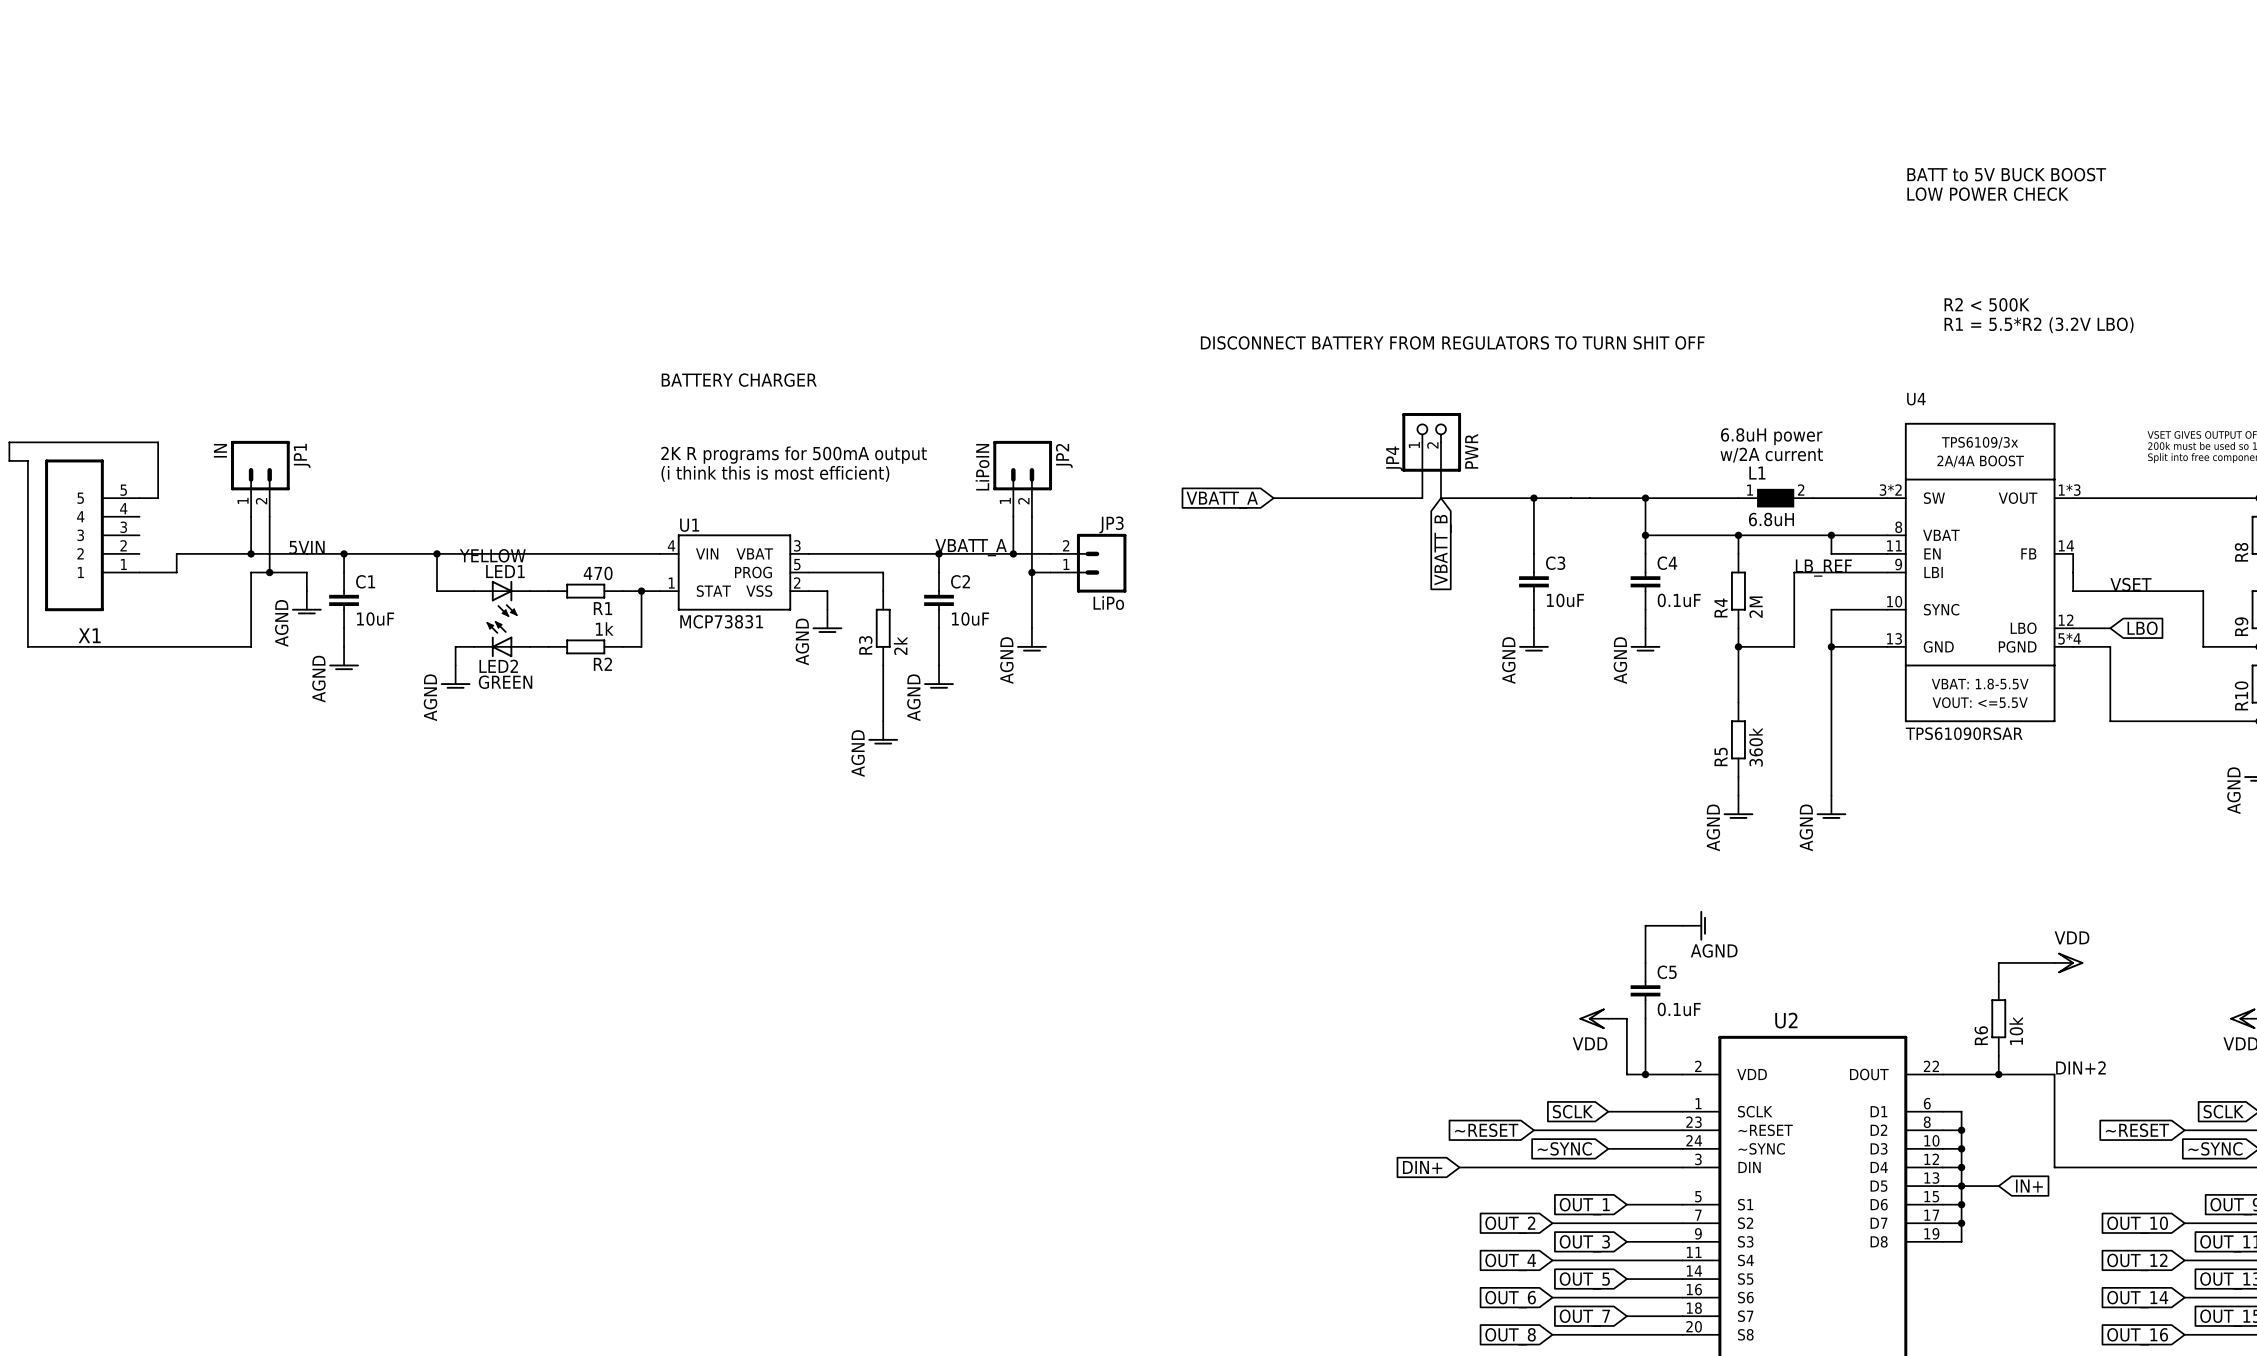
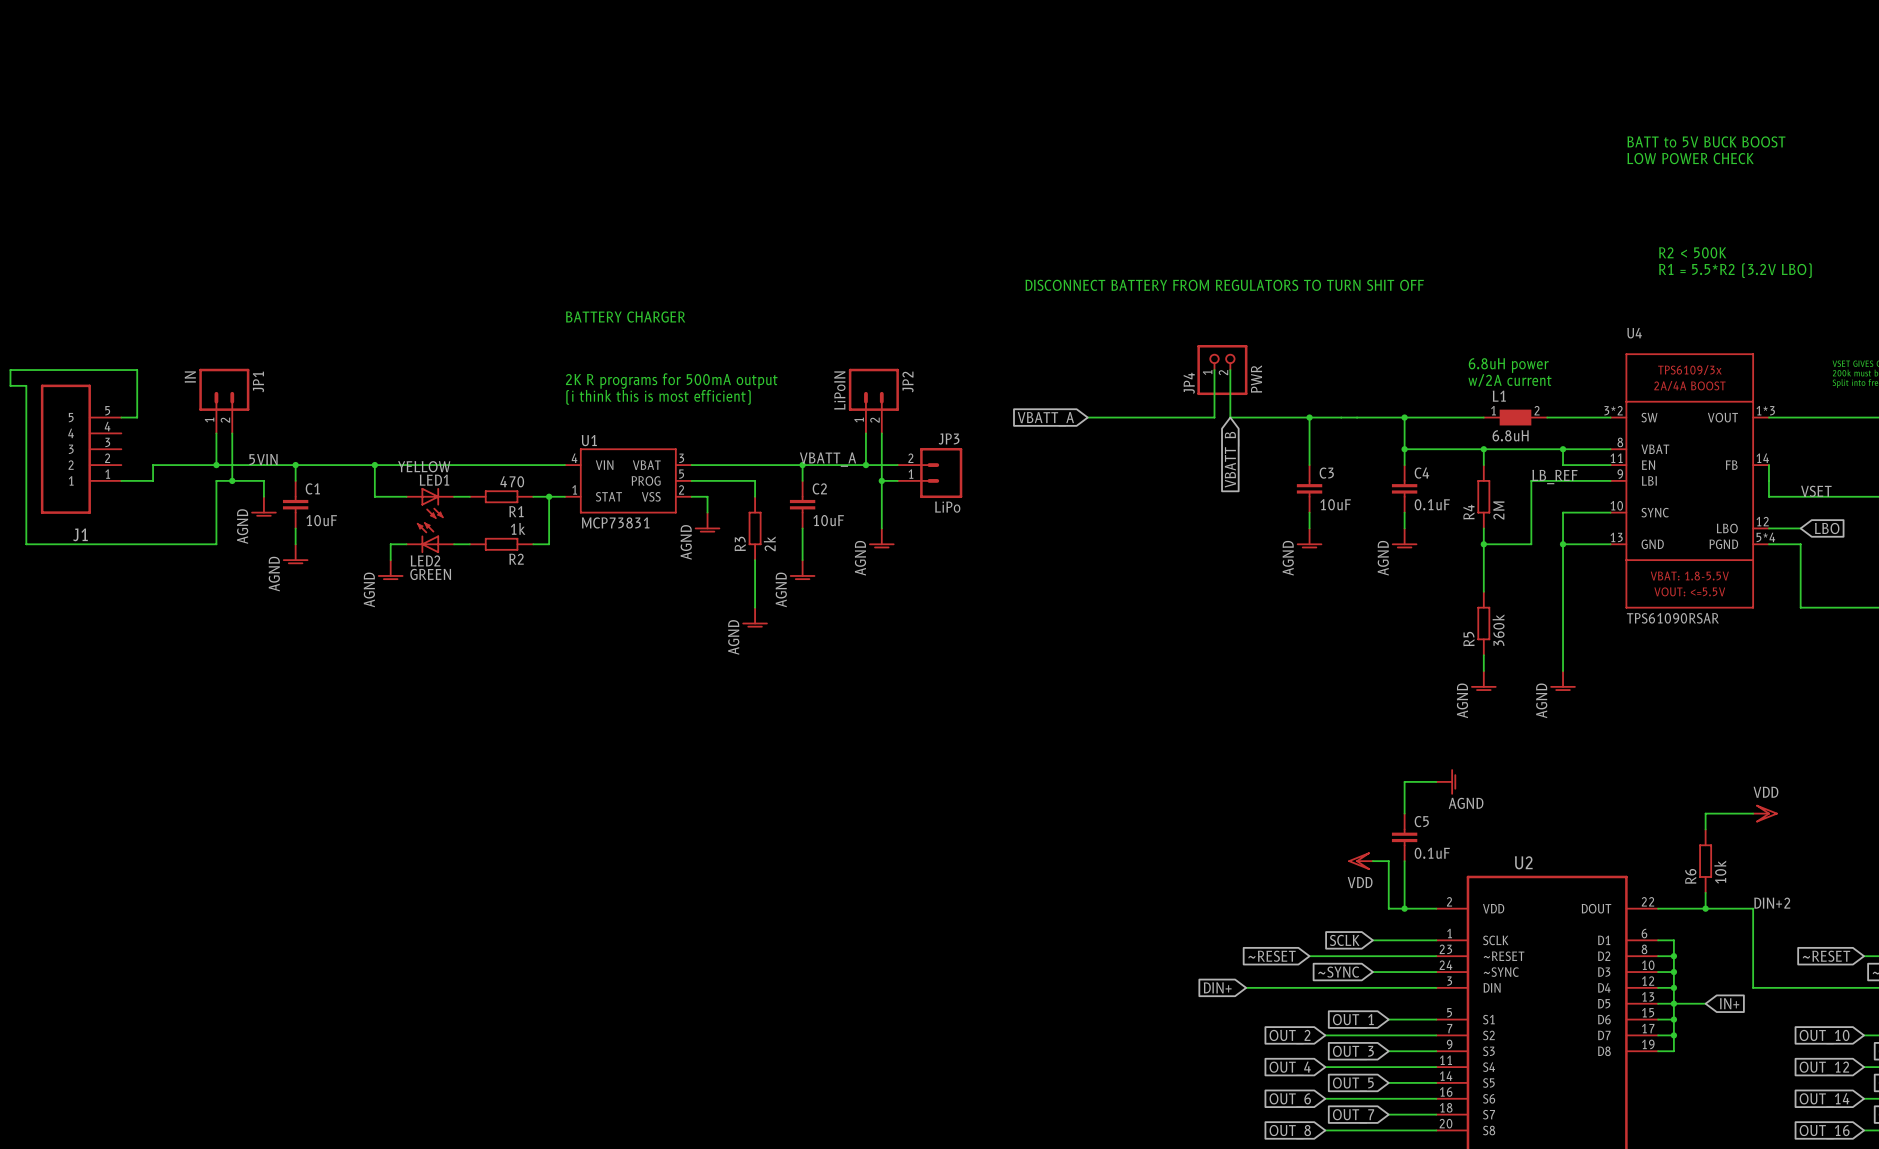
X1 name: X1 (89, 635) -> J1 (80, 534)

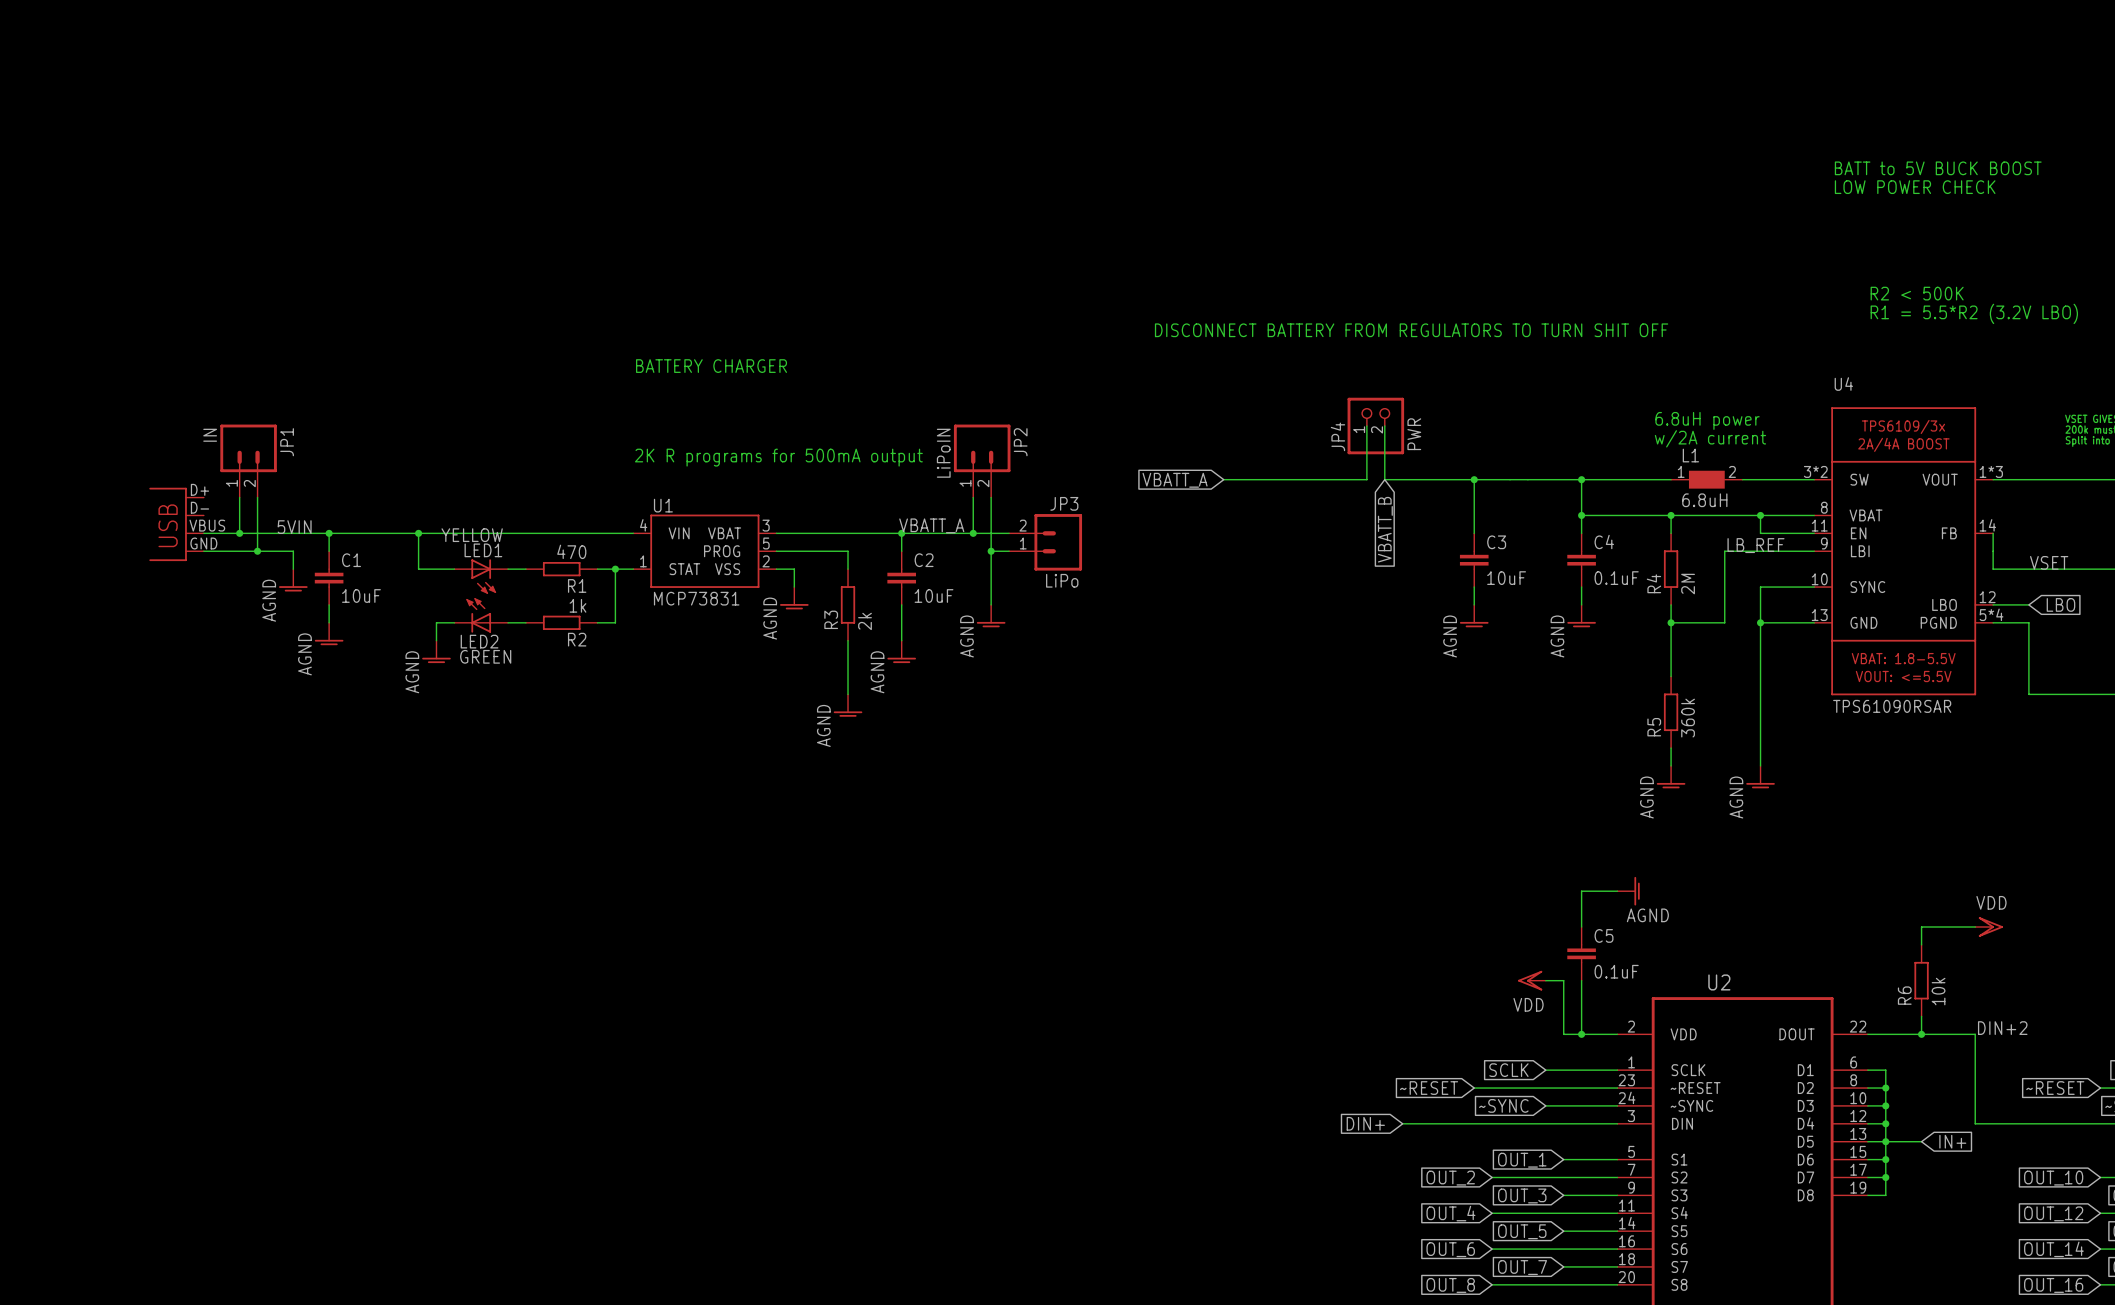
text: 2K R programs for 500mA output (671, 381) -> none
text: (i think this is most efficient) (658, 397) -> 2K R programs for 500mA output (778, 457)
wire: (121, 417) (137, 417) (137, 370) (10, 370) (10, 385) (26, 385) (26, 544) (216, 544) (216, 480) -> (203, 551) (239, 551)
J1: (81, 449) -> none
part: none -> (176, 524)
wire: (184, 465) (153, 465) (153, 480) (121, 480) -> none

